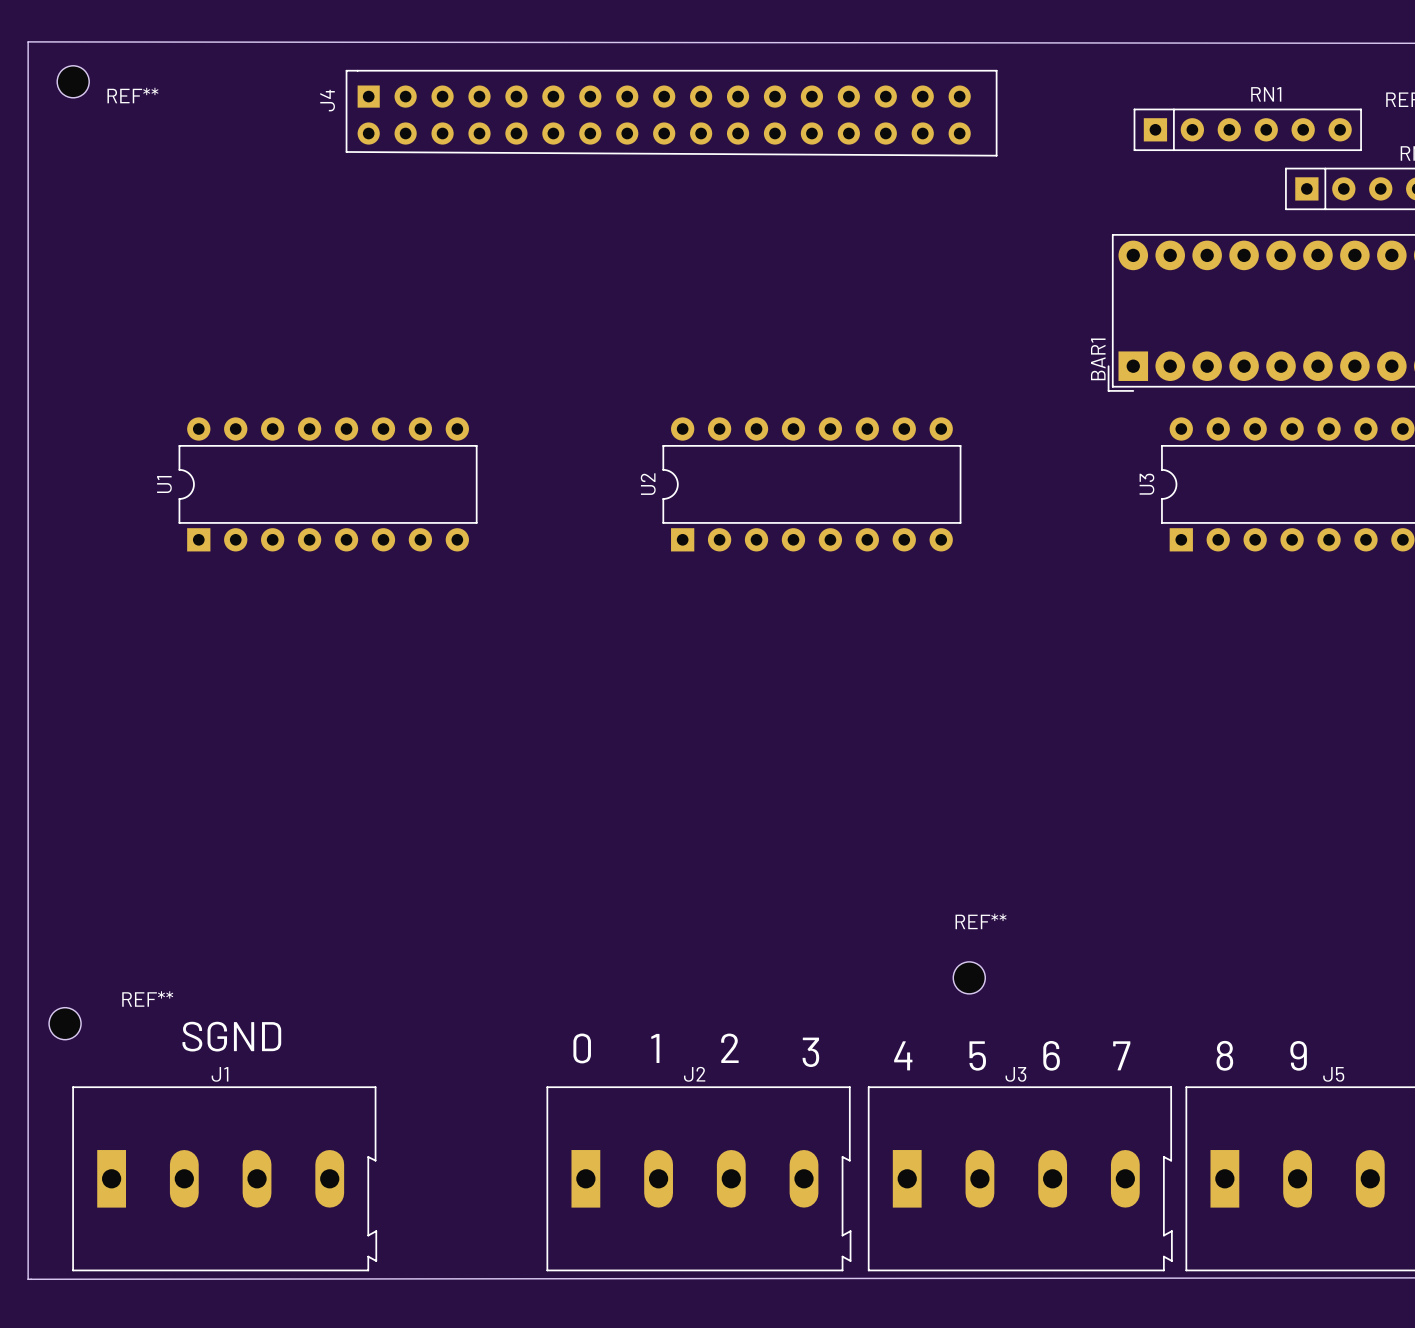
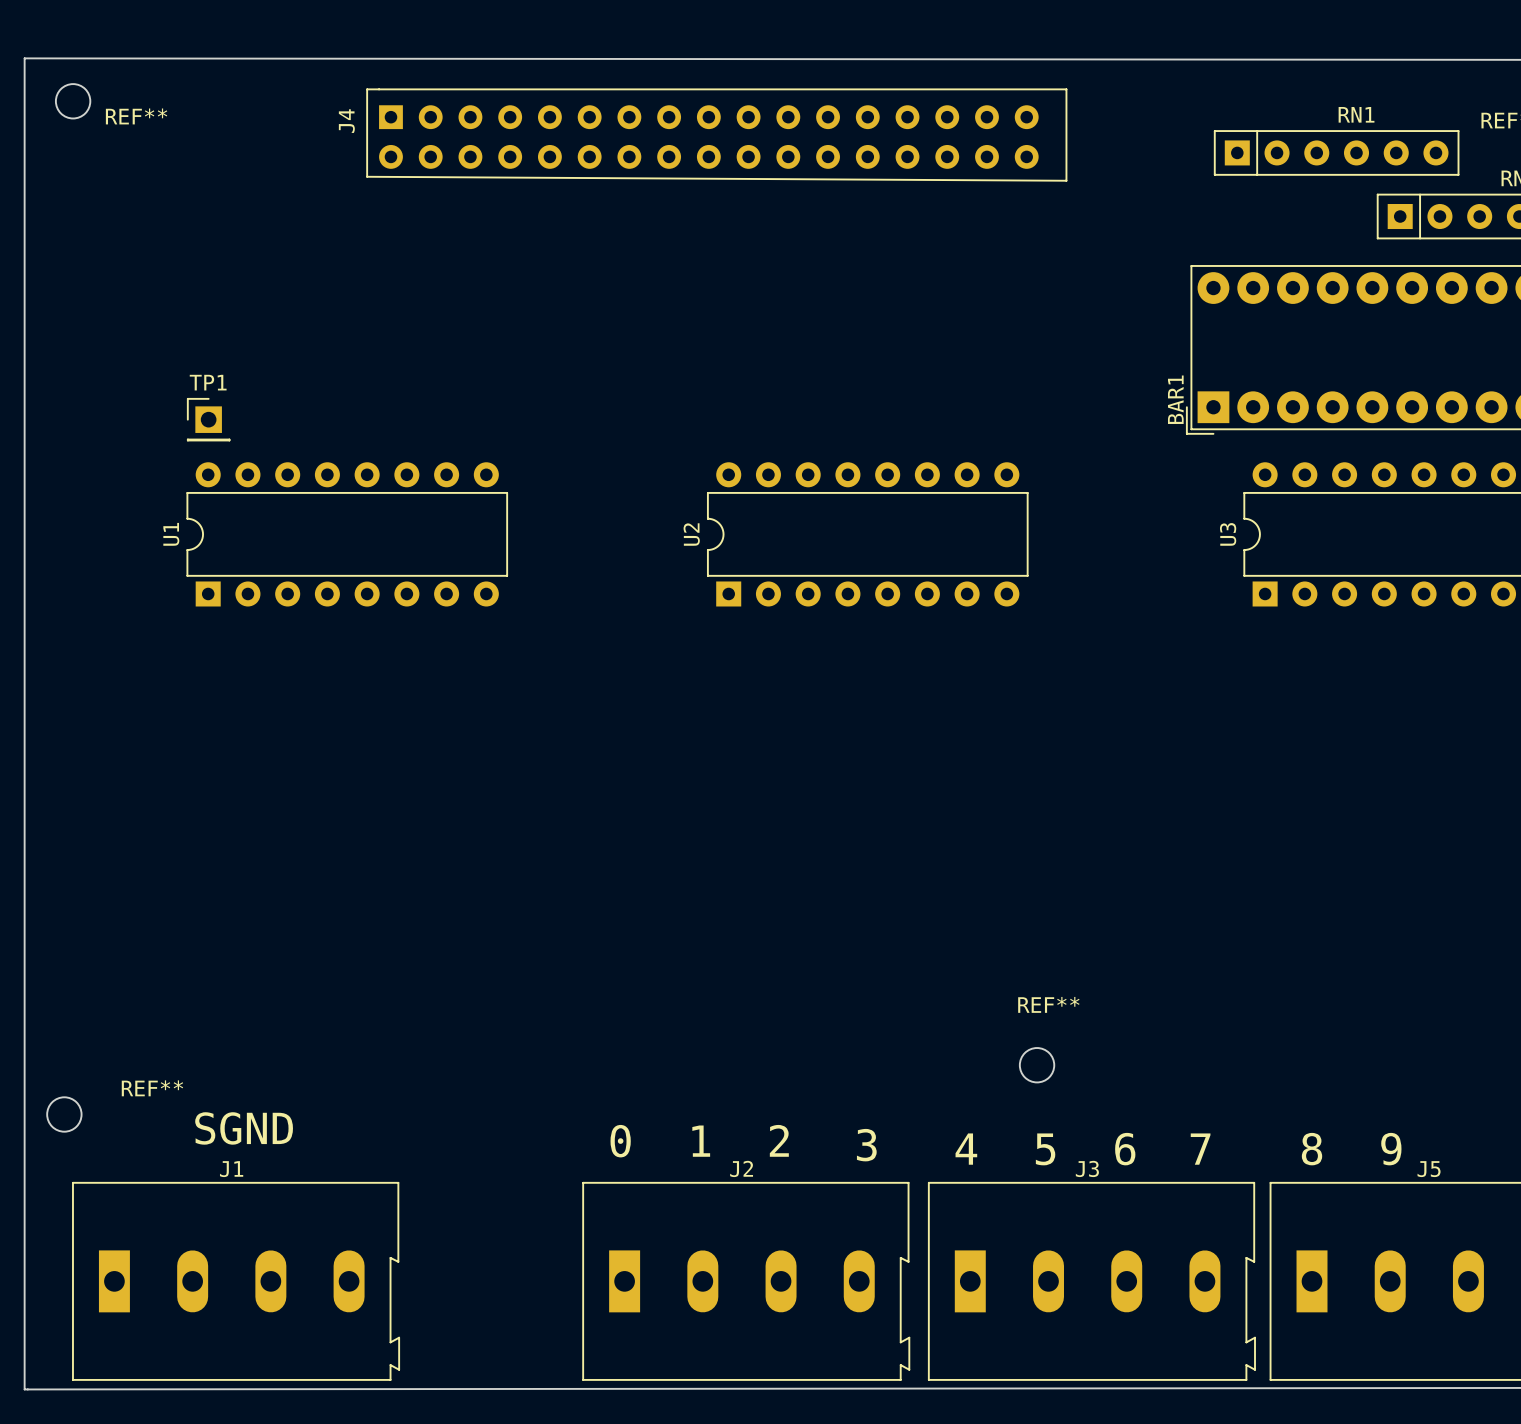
TP1: none -> (208, 419)

